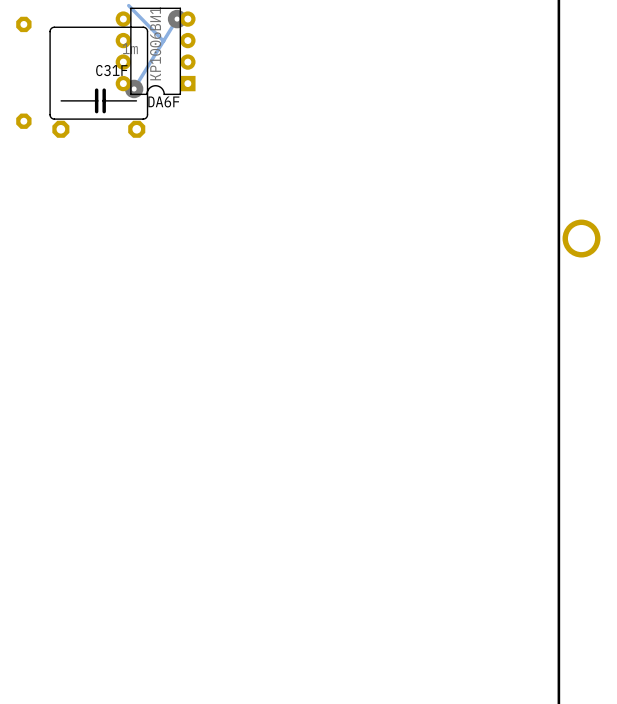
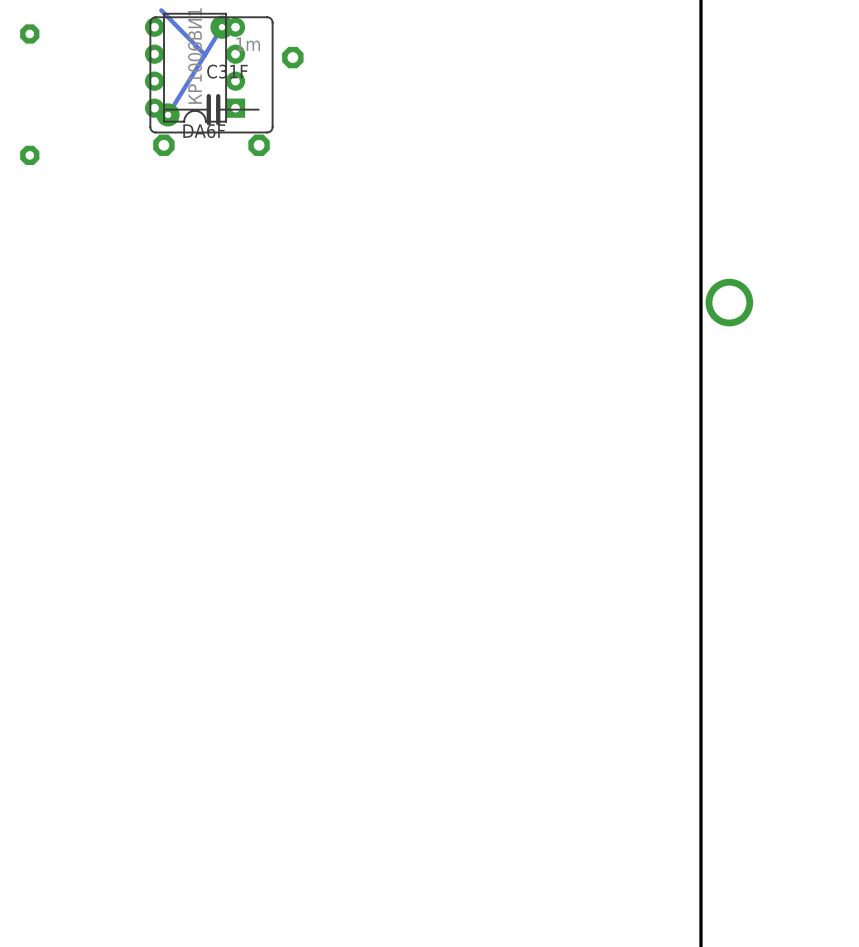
part: none -> (292, 57)
C31F position: (98, 82) -> (211, 86)

